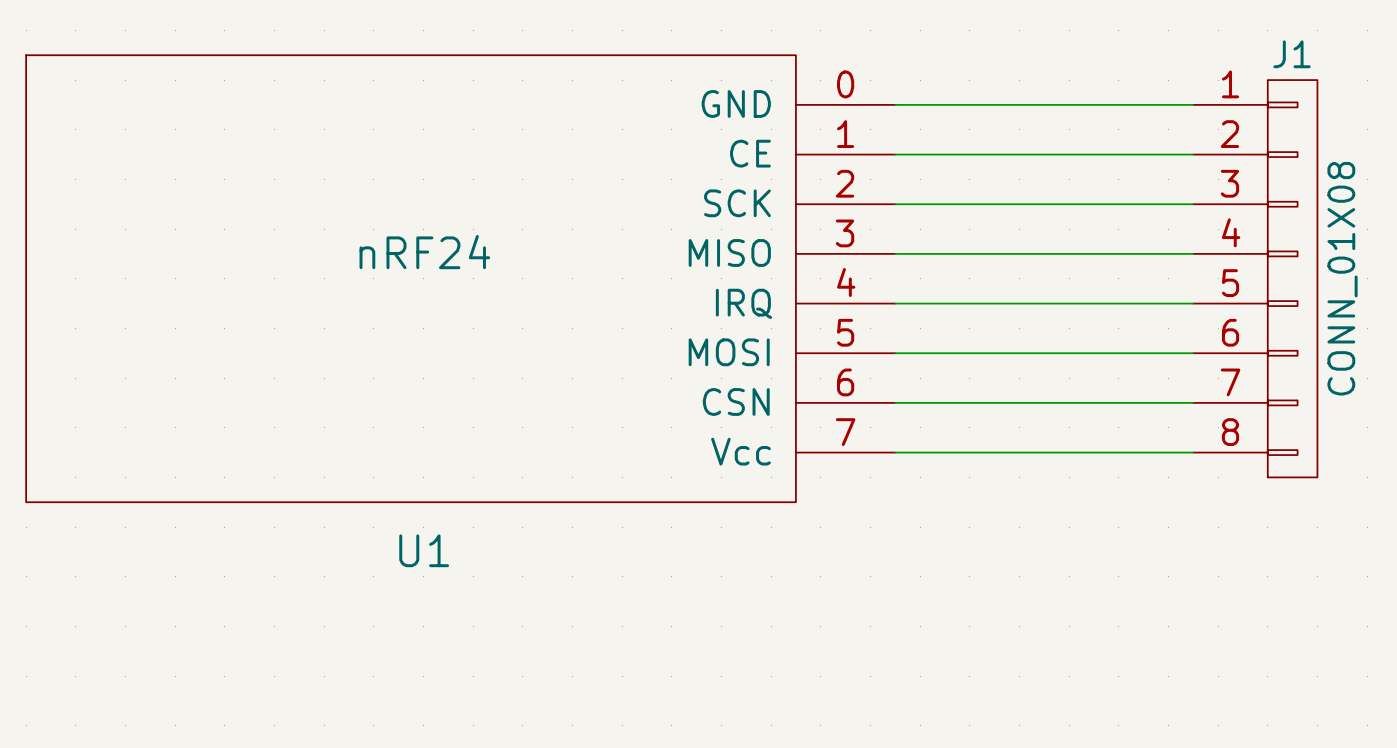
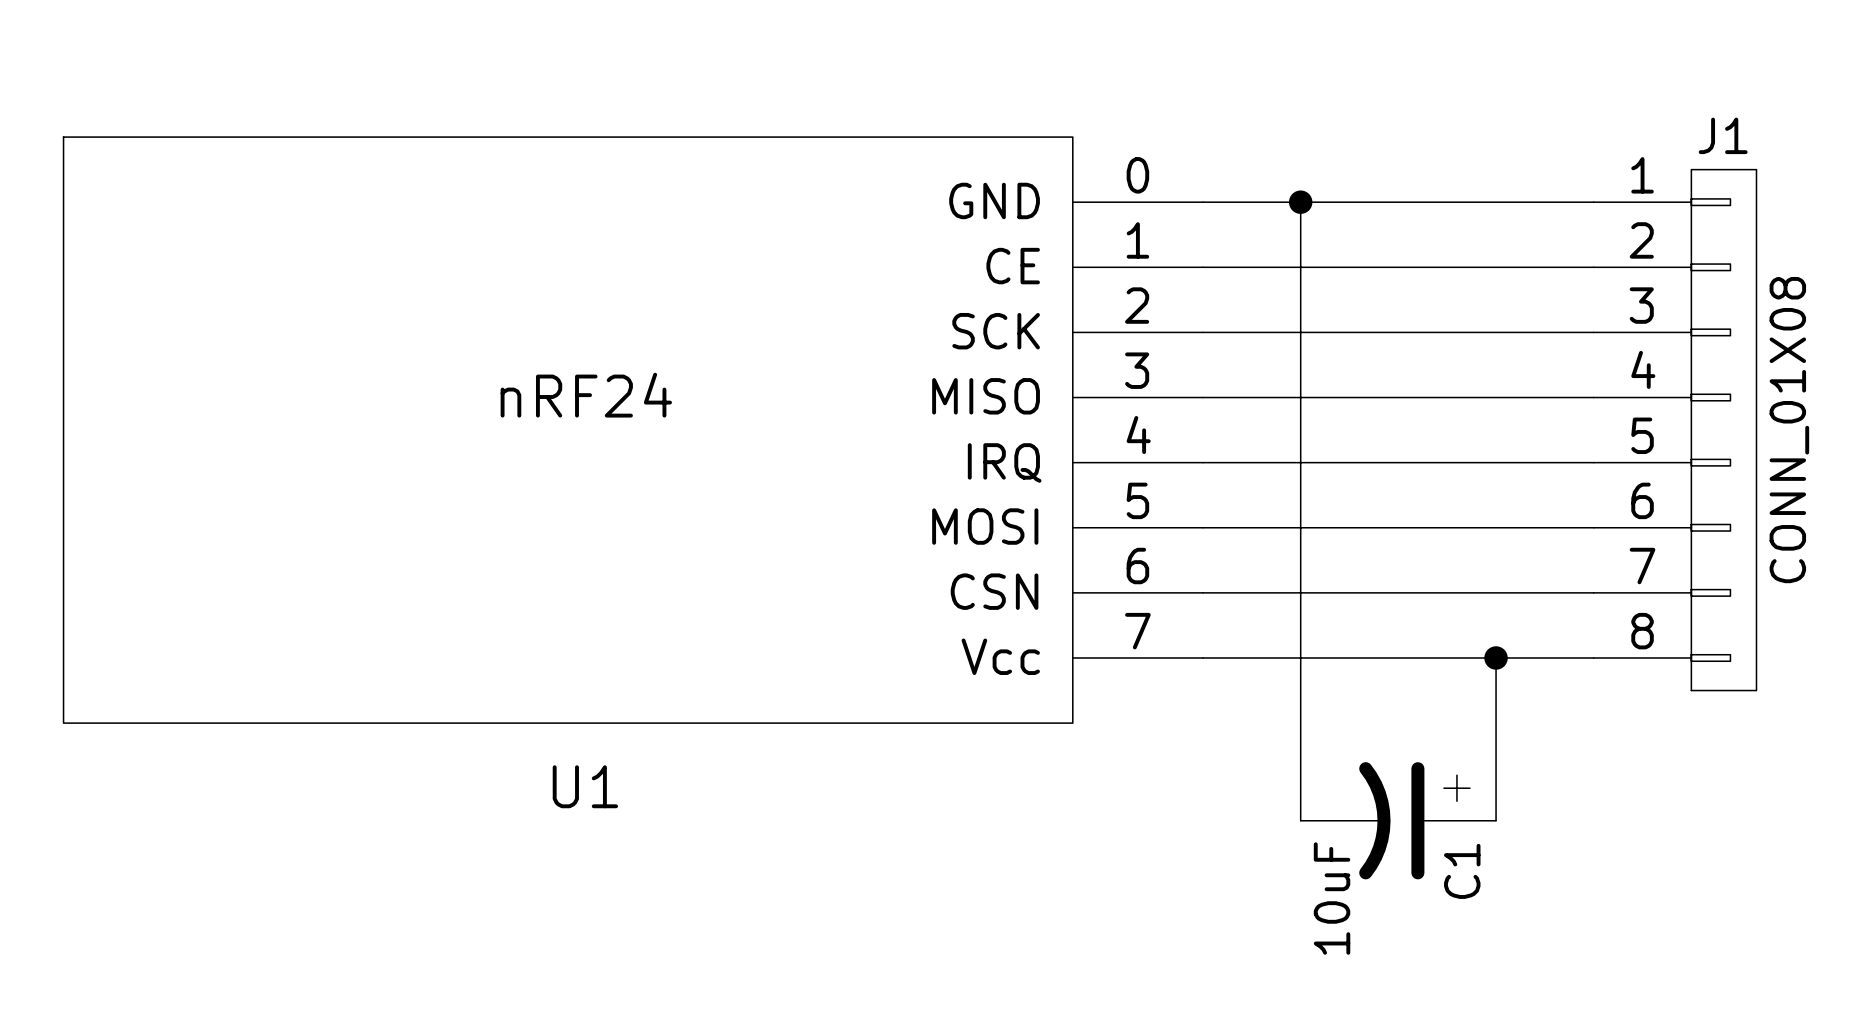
wire: none -> (1300, 202) (1300, 820)
junction: none -> (1300, 202)
wire: none -> (1496, 657) (1496, 820)
junction: none -> (1496, 657)
C1: none -> 10uF (1398, 820)

